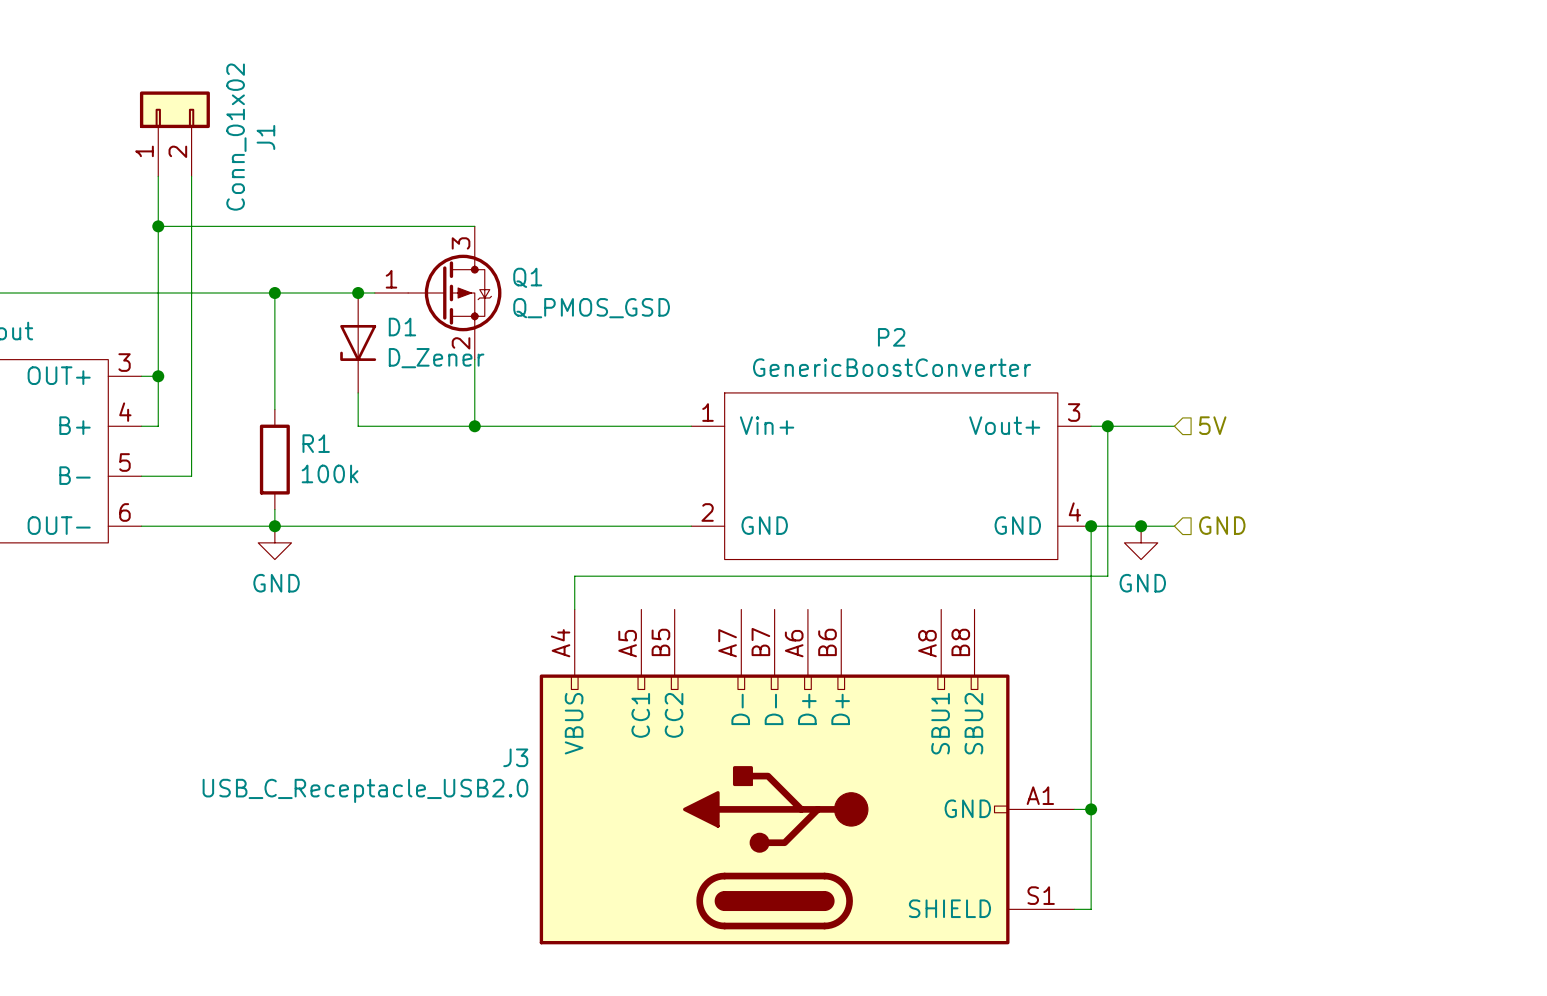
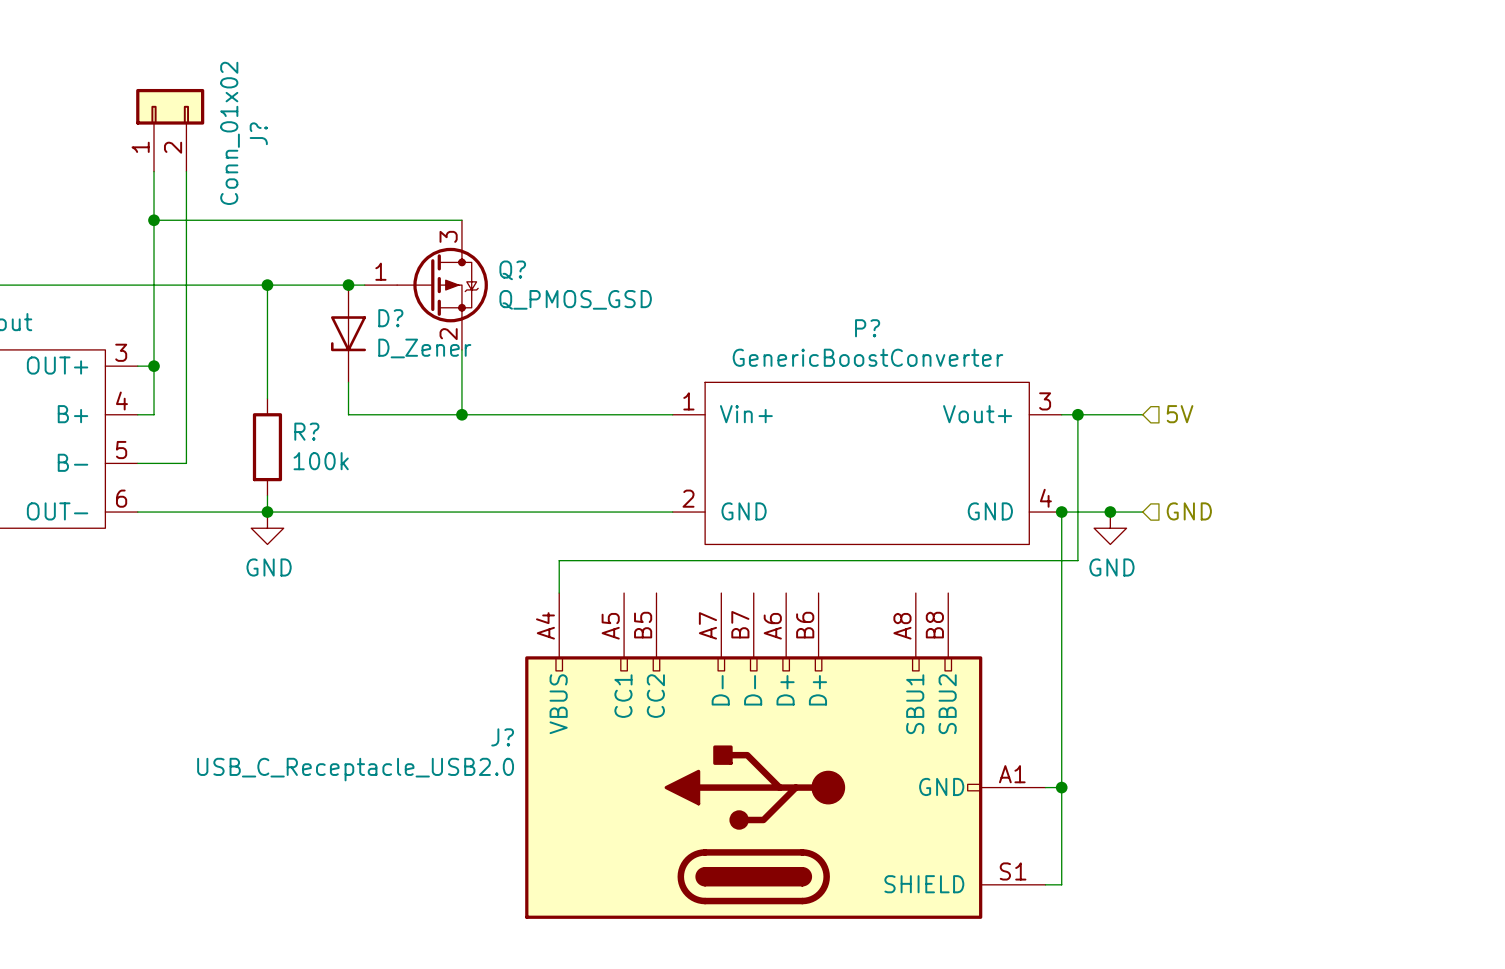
J1 name: J1 (265, 137) -> J? (258, 133)
Q1 name: Q1 (527, 277) -> Q? (512, 270)
D1 name: D1 (402, 327) -> D? (390, 318)
P2 name: P2 (891, 337) -> P? (867, 328)
R1 name: R1 (316, 443) -> R? (306, 431)
J3 name: J3 (515, 757) -> J? (502, 737)

